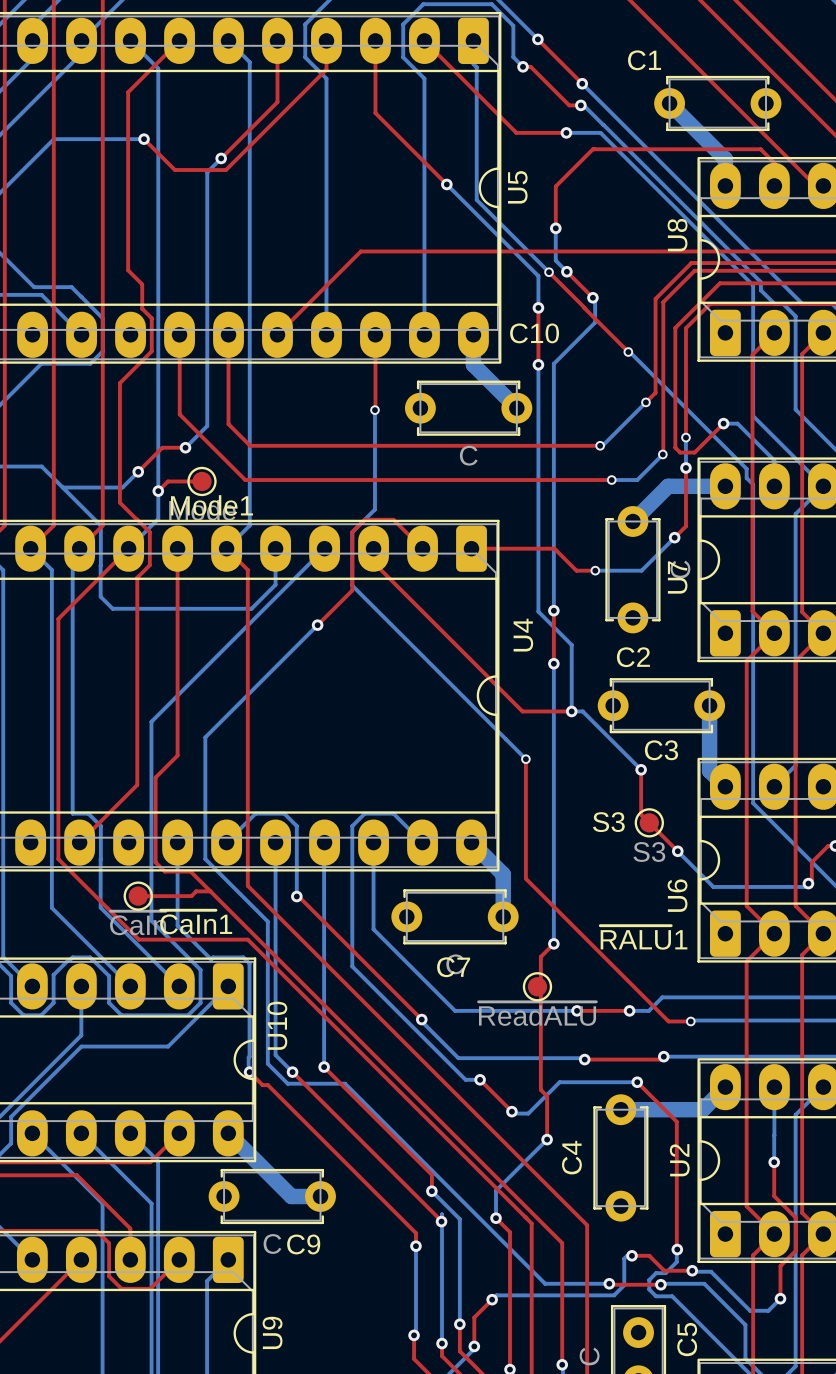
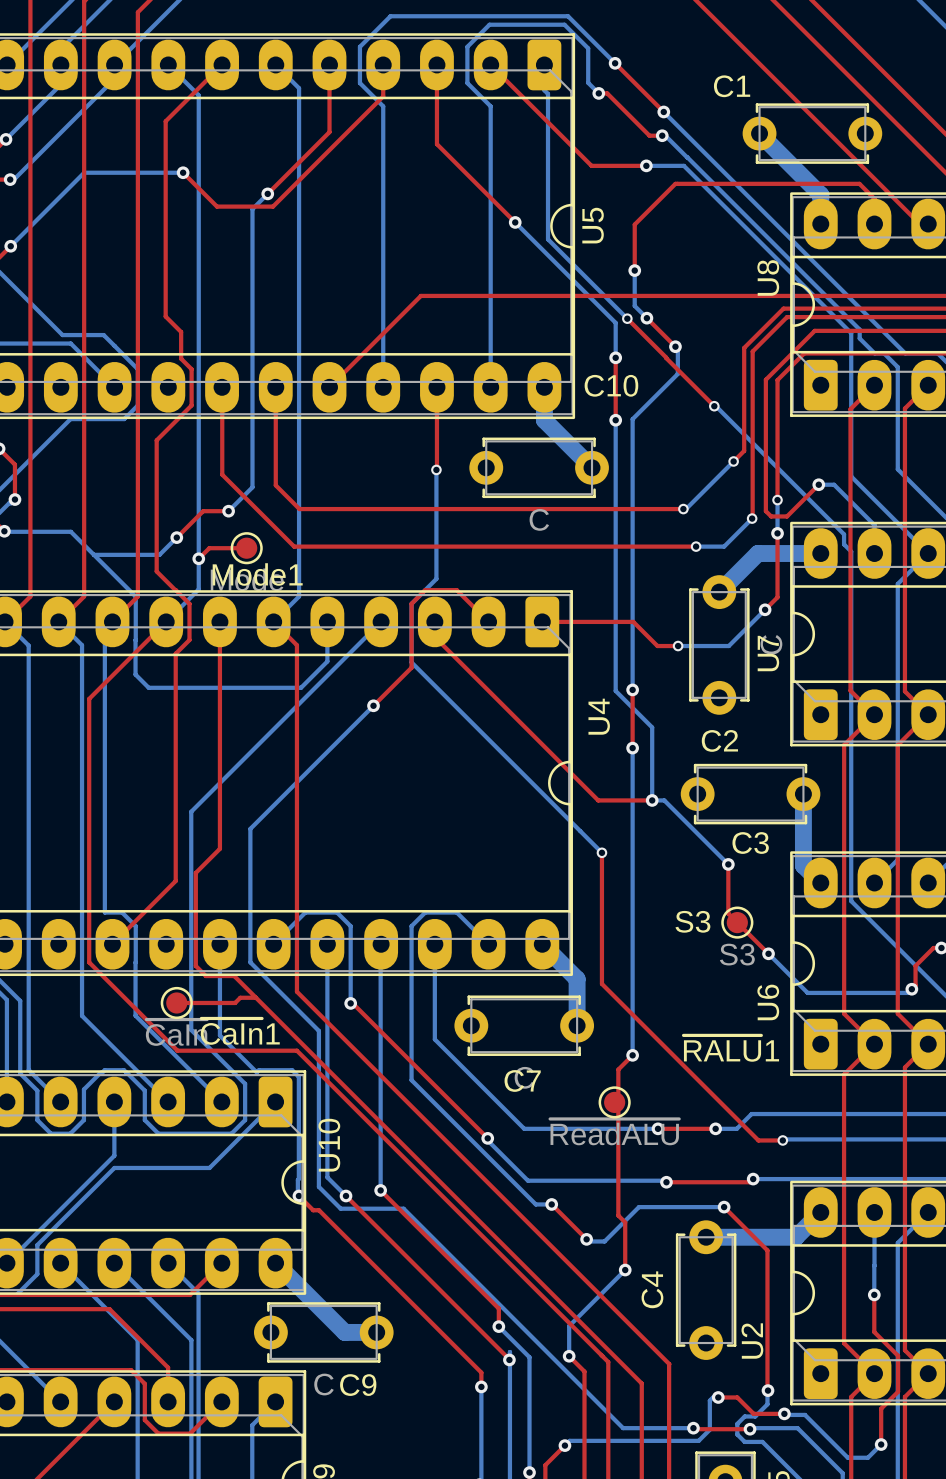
U2 name position: U2 (679, 1160) -> U2 (752, 1341)

